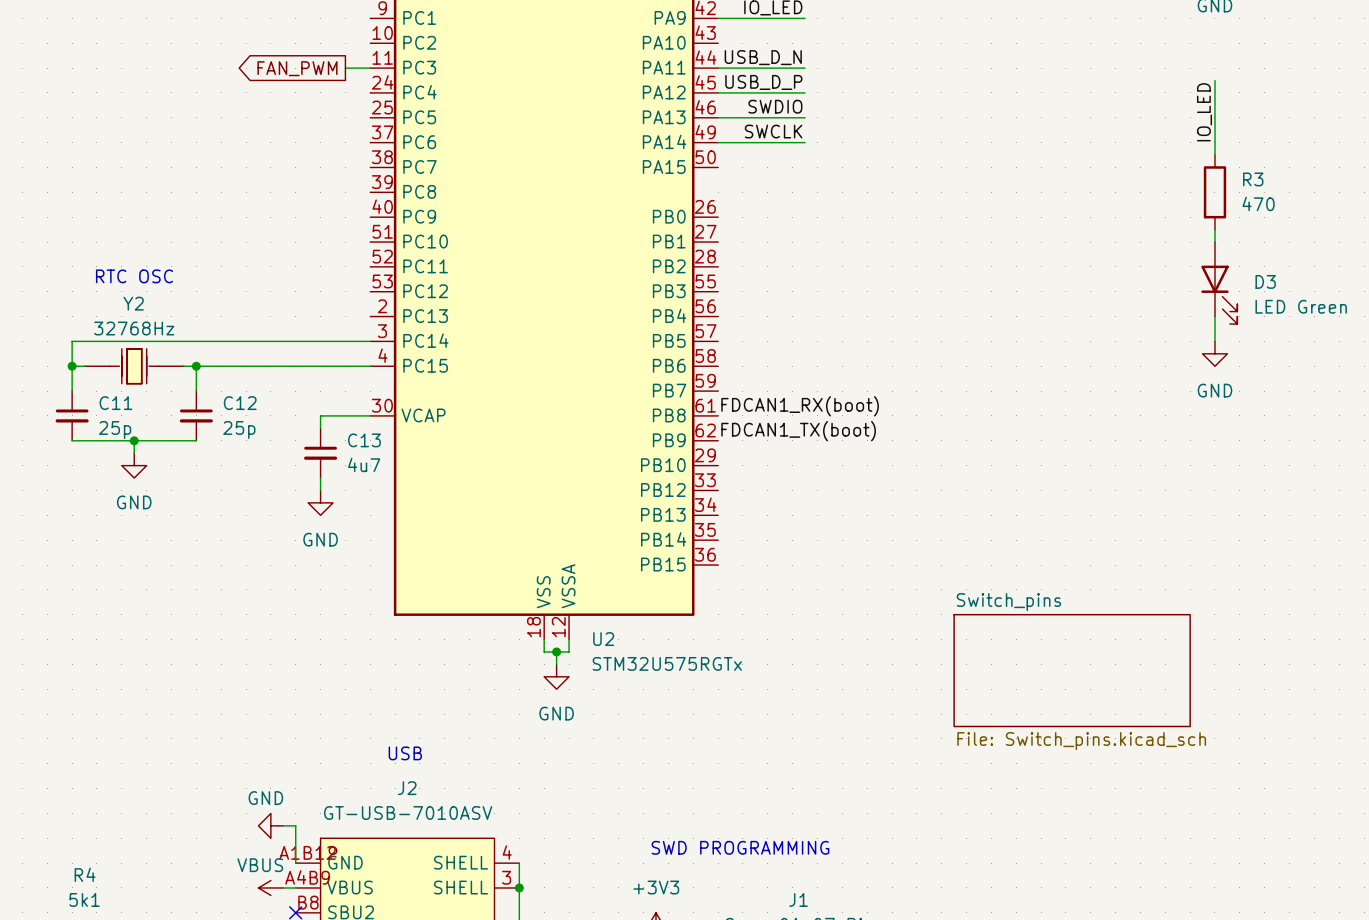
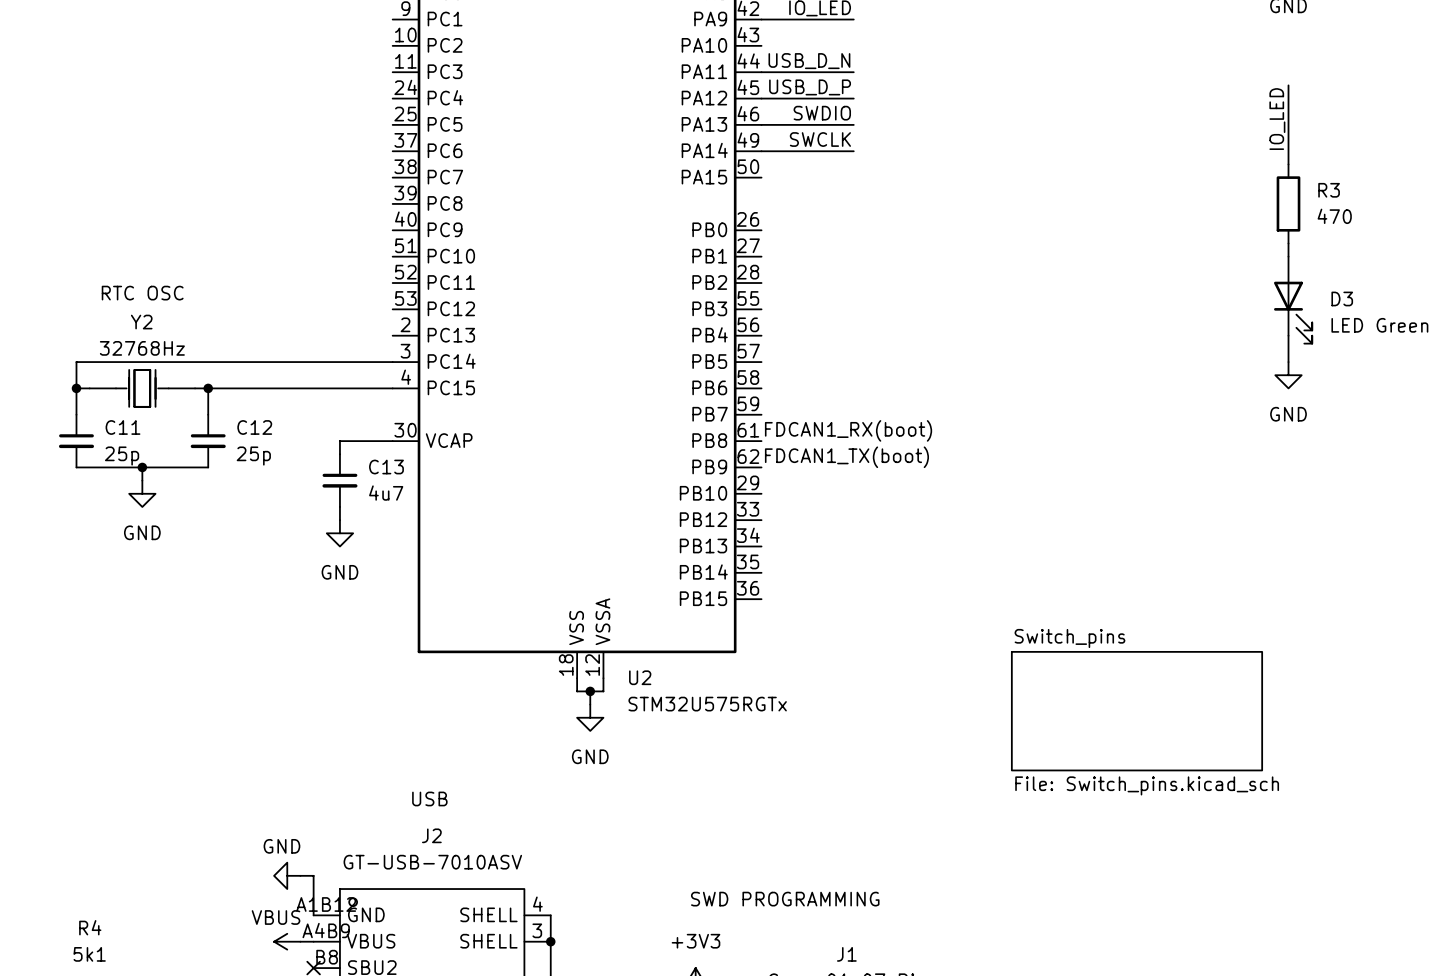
global label: FAN_PWM (297, 68) -> none
wire: (345, 68) (370, 68) -> none

